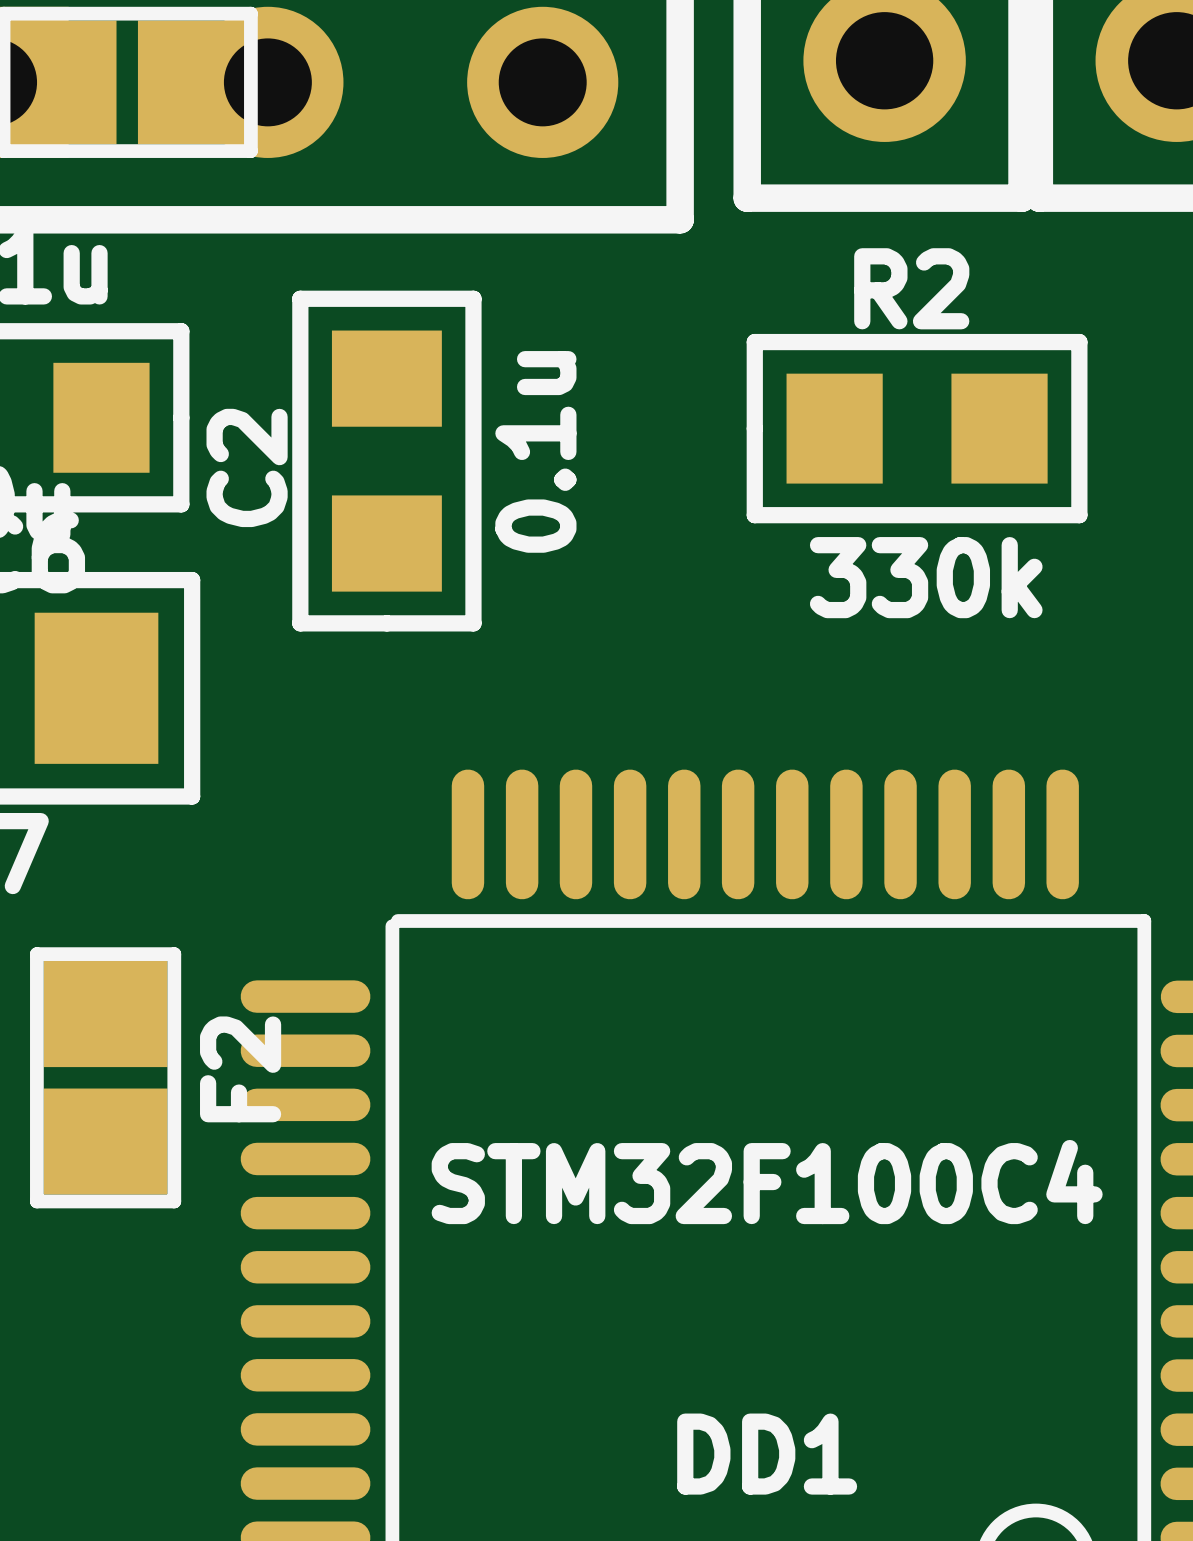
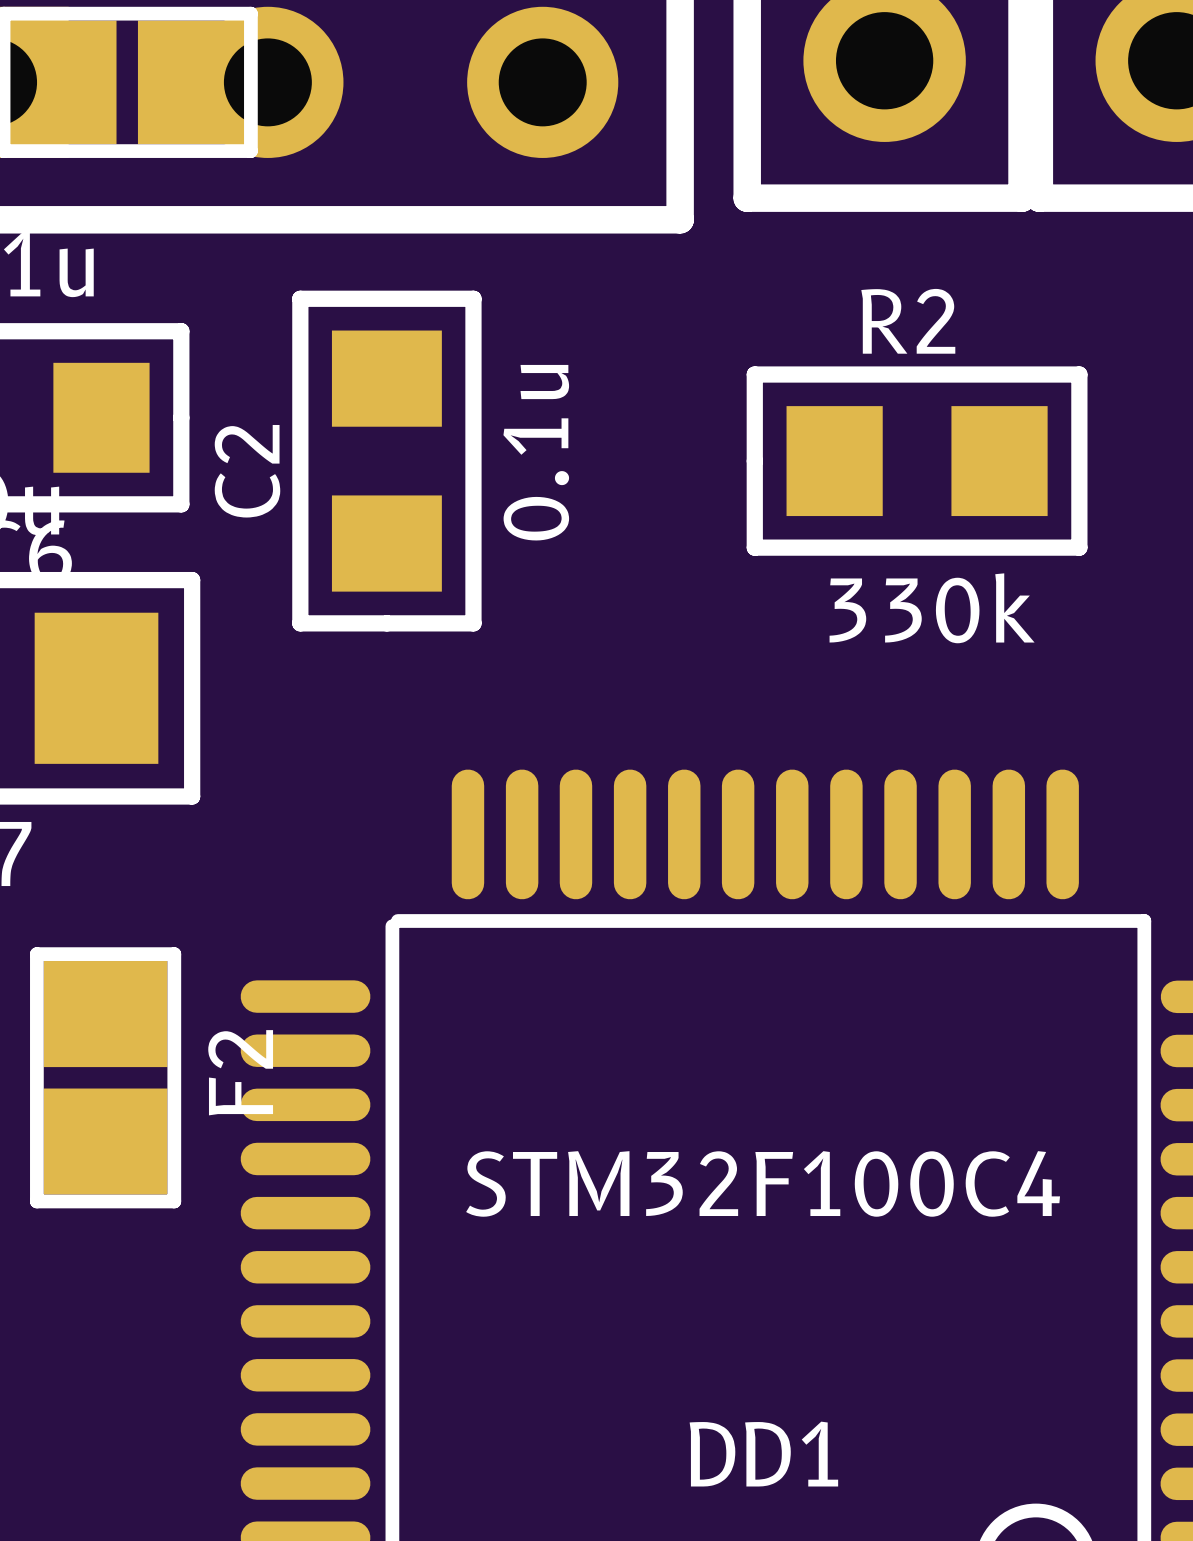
R2 position: (917, 428) -> (917, 461)

